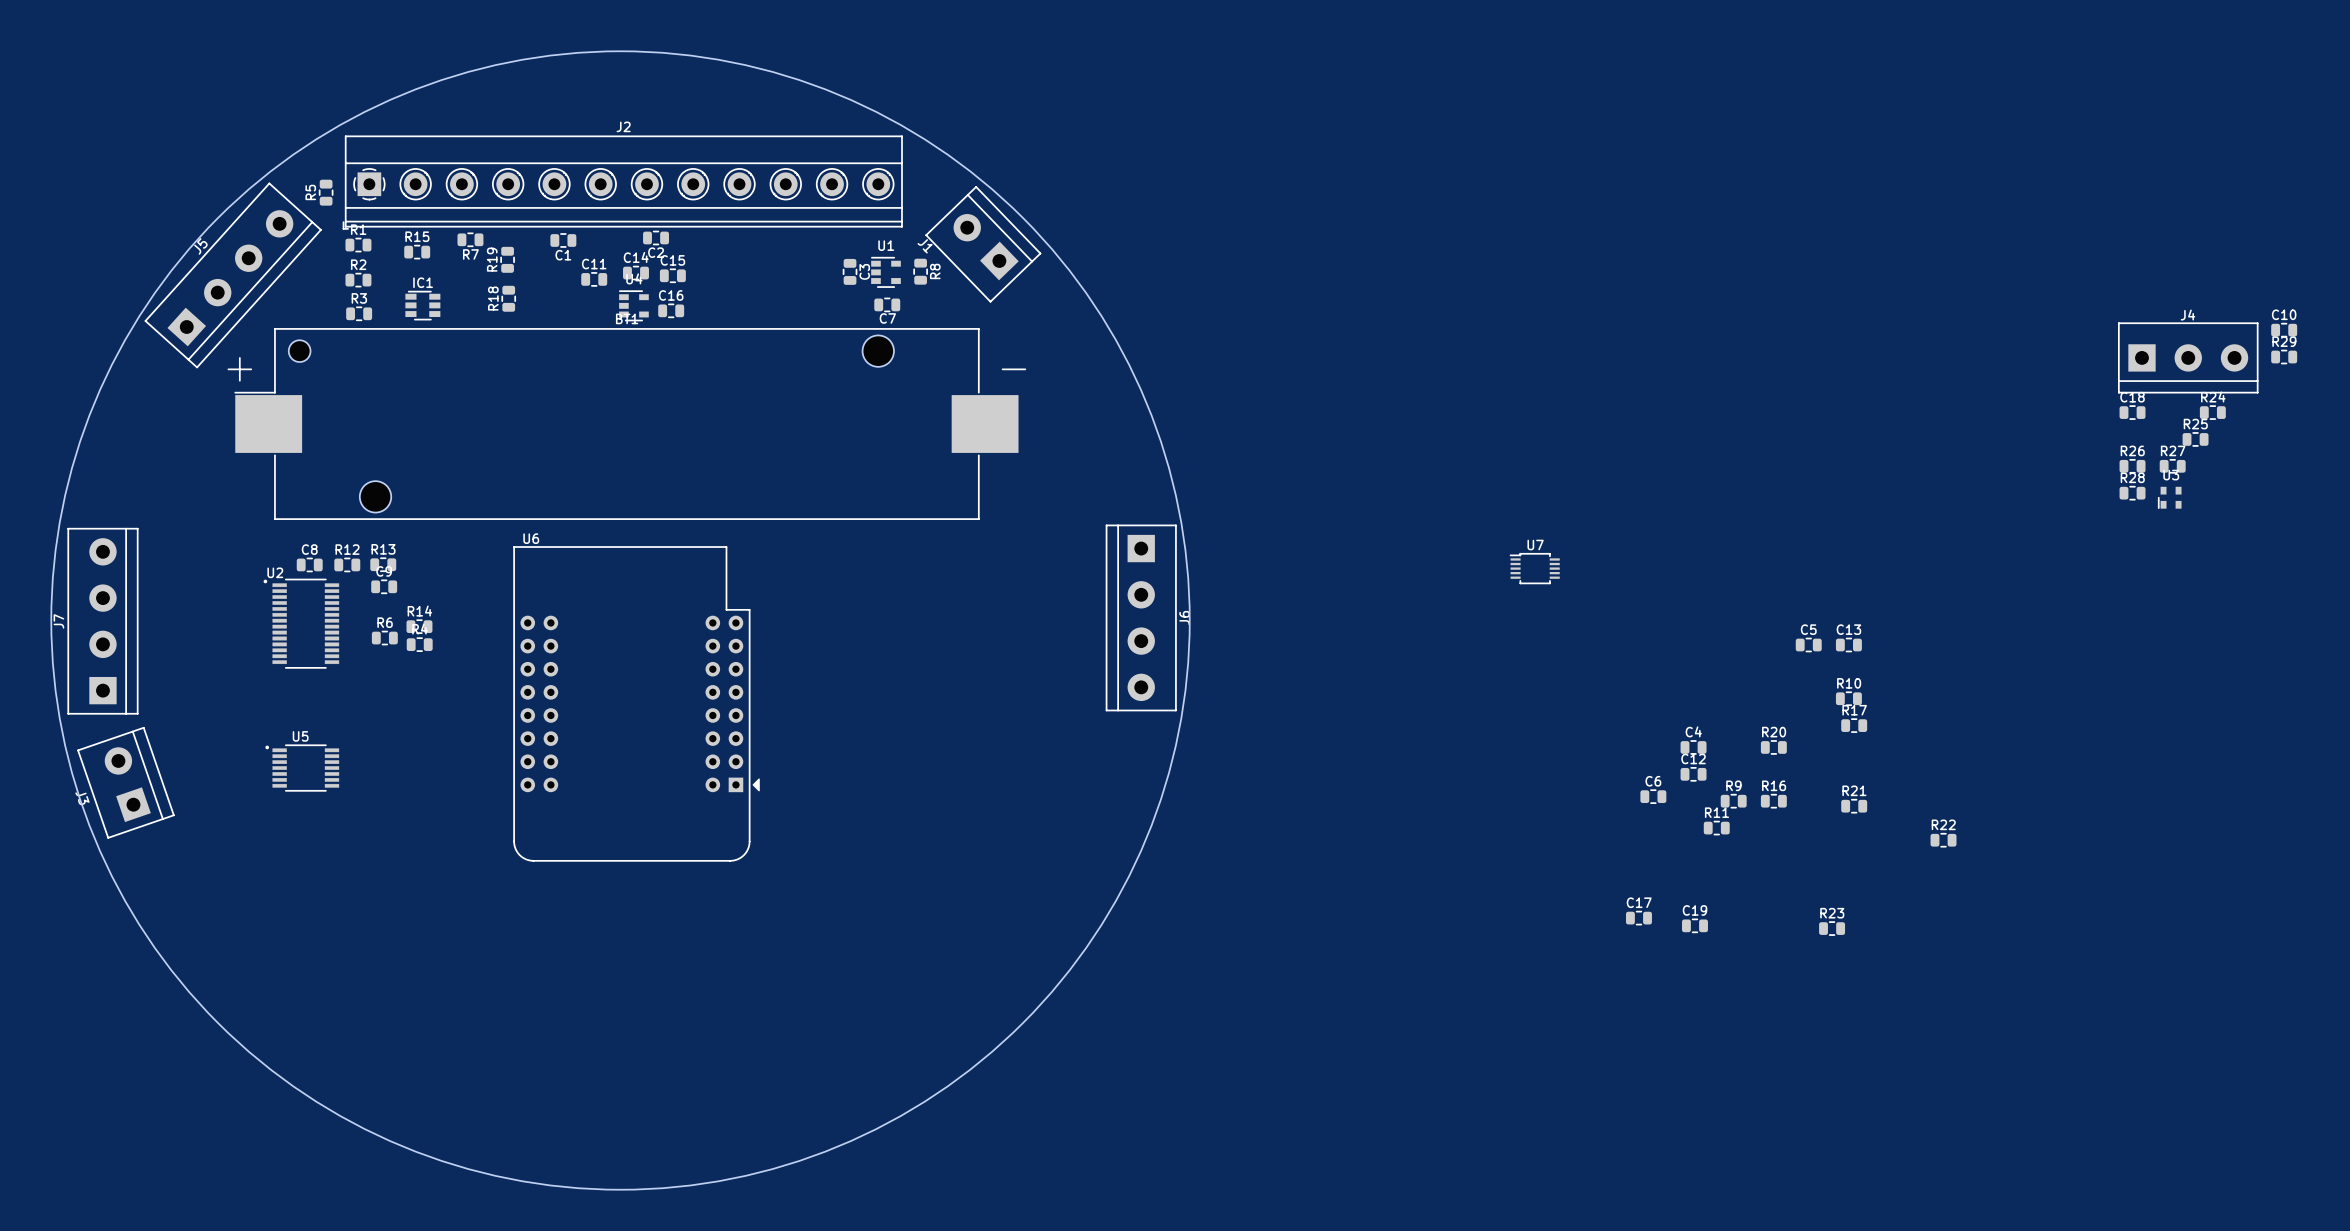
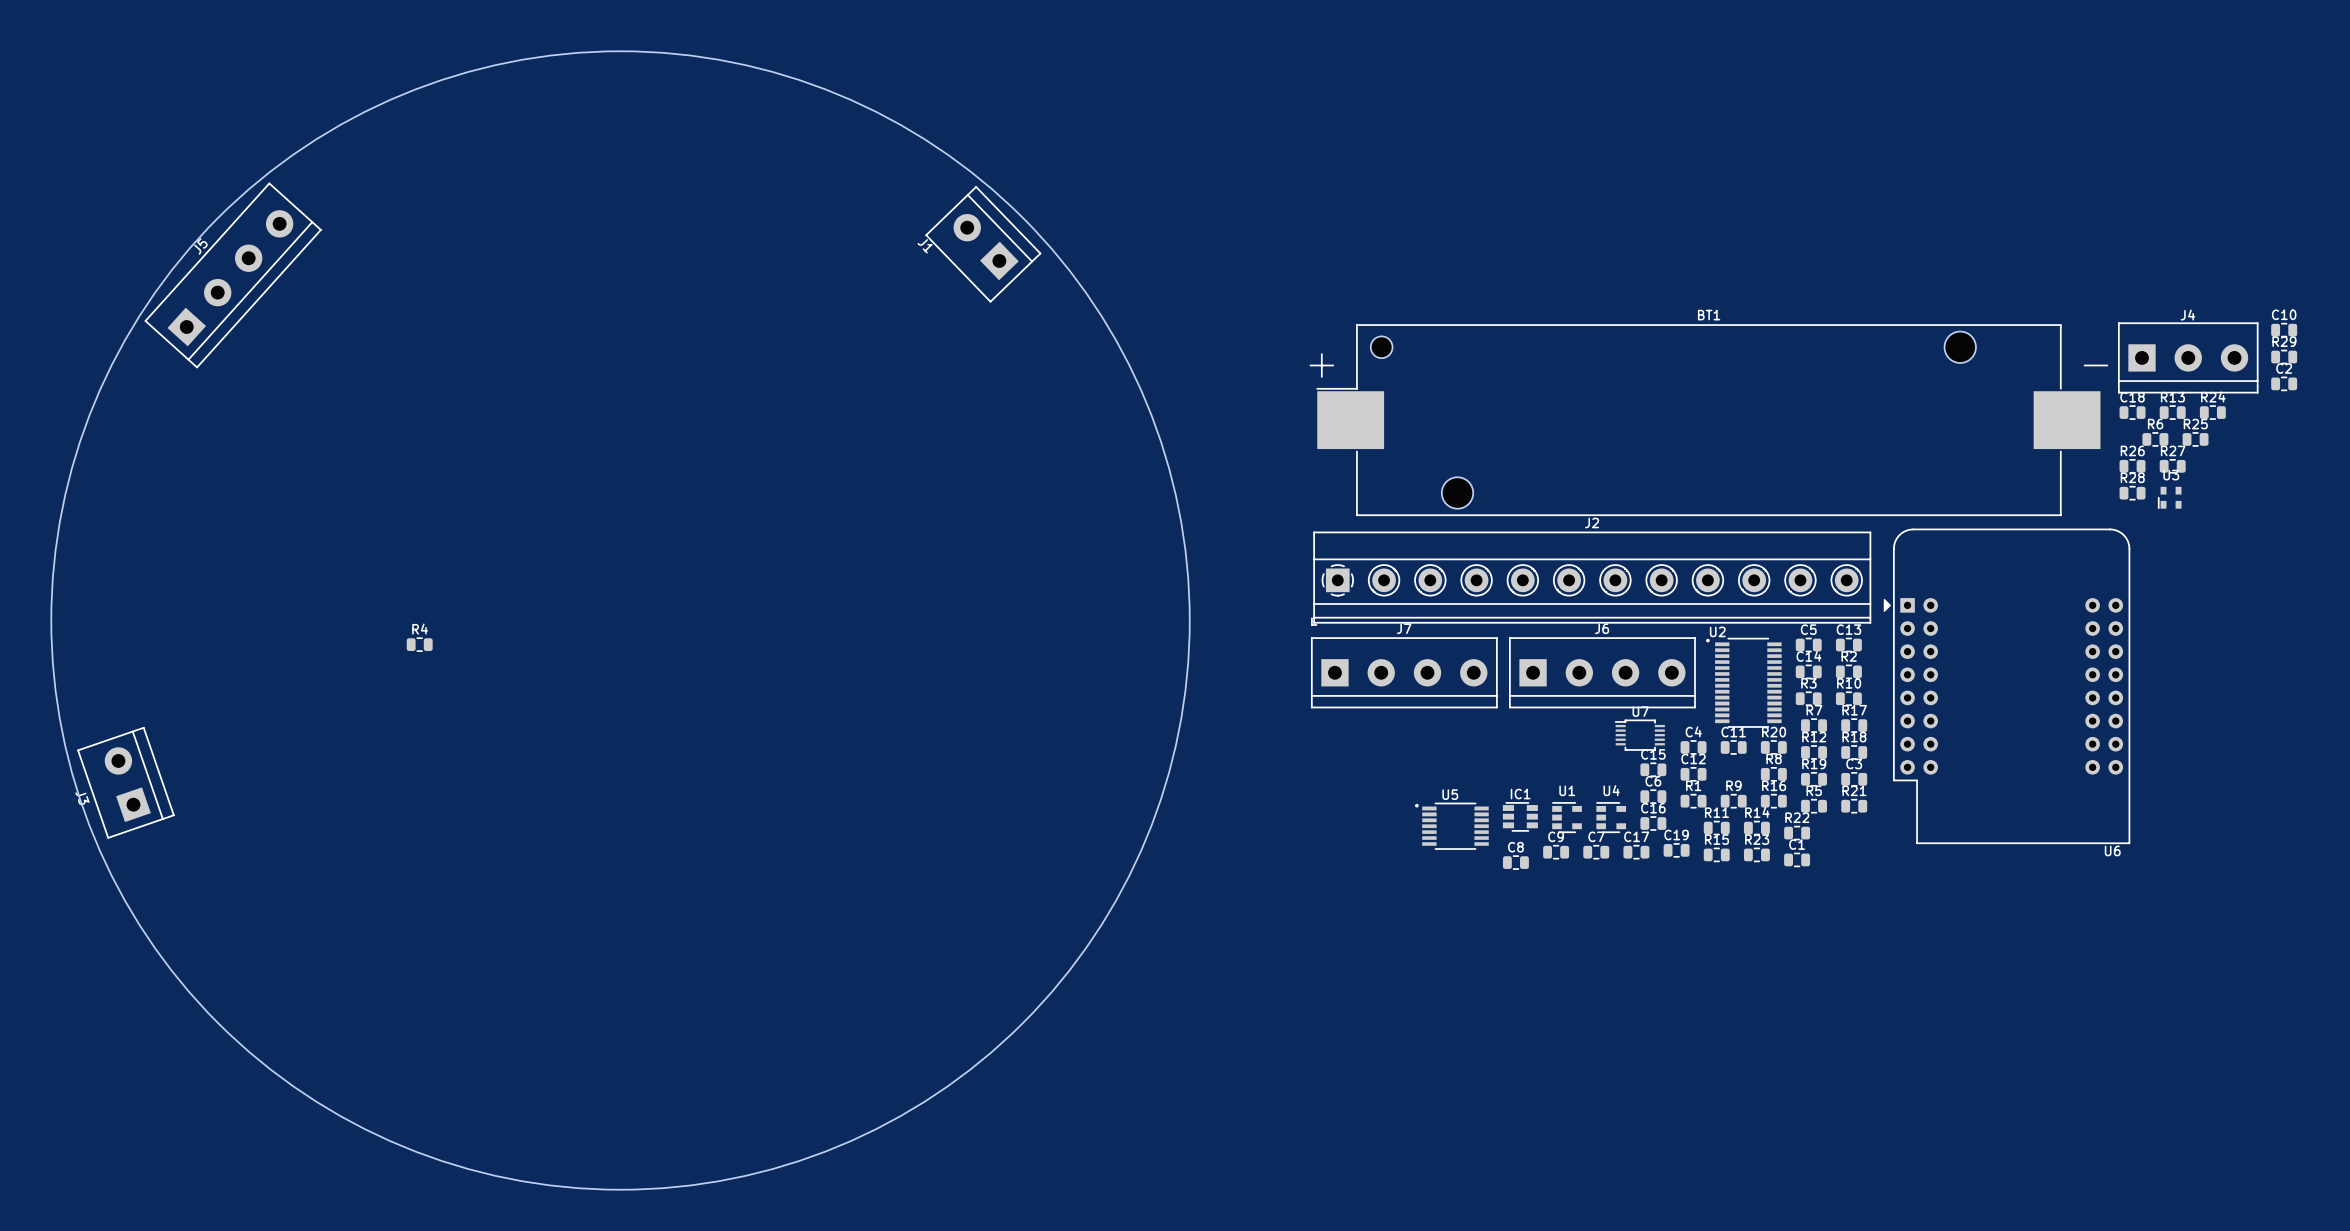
J2 position: (622, 182) -> (1591, 578)
R5 rotation: 0° (326, 192) -> 90° clockwise (1814, 806)
R5 position: (326, 192) -> (1814, 806)
C2 position: (656, 237) -> (2284, 383)
R7 position: (470, 239) -> (1814, 725)
C1 position: (563, 240) -> (1797, 859)
R1 position: (358, 245) -> (1693, 801)
R15 position: (417, 252) -> (1716, 854)
C2 name position: C2 (656, 252) -> C2 (2284, 368)
R7 name position: R7 (470, 254) -> R7 (1814, 710)
C1 name position: C1 (563, 255) -> C1 (1797, 844)
R19 rotation: 0° (507, 259) -> 90° clockwise (1814, 779)
R19 position: (507, 259) -> (1814, 779)
C3 rotation: 0° (850, 271) -> 90° clockwise (1854, 779)
C3 position: (850, 271) -> (1854, 779)
C3 name position: C3 (864, 271) -> C3 (1854, 763)
R8 rotation: 0° (920, 271) -> 90° clockwise (1773, 774)
R8 position: (920, 271) -> (1773, 774)
R8 name position: R8 (935, 271) -> R8 (1774, 758)
U1 position: (886, 272) -> (1567, 817)
C14 position: (636, 273) -> (1808, 671)
C15 position: (672, 275) -> (1653, 769)
C11 position: (594, 279) -> (1733, 747)
R2 position: (358, 280) -> (1848, 671)
R18 rotation: 0° (508, 298) -> 90° clockwise (1854, 752)
R18 position: (508, 298) -> (1854, 752)
C7 position: (887, 304) -> (1596, 852)
IC1 position: (422, 305) -> (1520, 816)
U4 position: (633, 305) -> (1611, 817)
C16 position: (671, 310) -> (1653, 823)
R3 position: (359, 313) -> (1808, 698)
C7 name position: C7 (887, 318) -> C7 (1596, 836)
BT1 position: (626, 424) -> (1708, 420)
C8 position: (309, 564) -> (1515, 862)
R12 position: (347, 564) -> (1814, 752)
R13 position: (383, 564) -> (2172, 412)
U7 position: (1534, 568) -> (1639, 735)
C9 position: (384, 586) -> (1556, 852)
J6 rotation: 0° (1141, 617) -> 90° counterclockwise (1602, 672)
J6 position: (1141, 617) -> (1602, 672)
J7 rotation: 0° (102, 621) -> 90° clockwise (1404, 672)
J7 position: (102, 621) -> (1404, 672)
U2 position: (301, 623) -> (1743, 682)
R14 position: (419, 626) -> (1756, 828)
R6 position: (384, 638) -> (2155, 439)
U6 rotation: 0° (636, 703) -> 180° (2006, 686)
U6 position: (636, 703) -> (2006, 686)
U5 position: (302, 768) -> (1451, 826)
R22 position: (1943, 840) -> (1797, 833)
C17 position: (1638, 918) -> (1636, 852)
C19 position: (1694, 925) -> (1676, 850)
R23 position: (1832, 928) -> (1756, 854)

